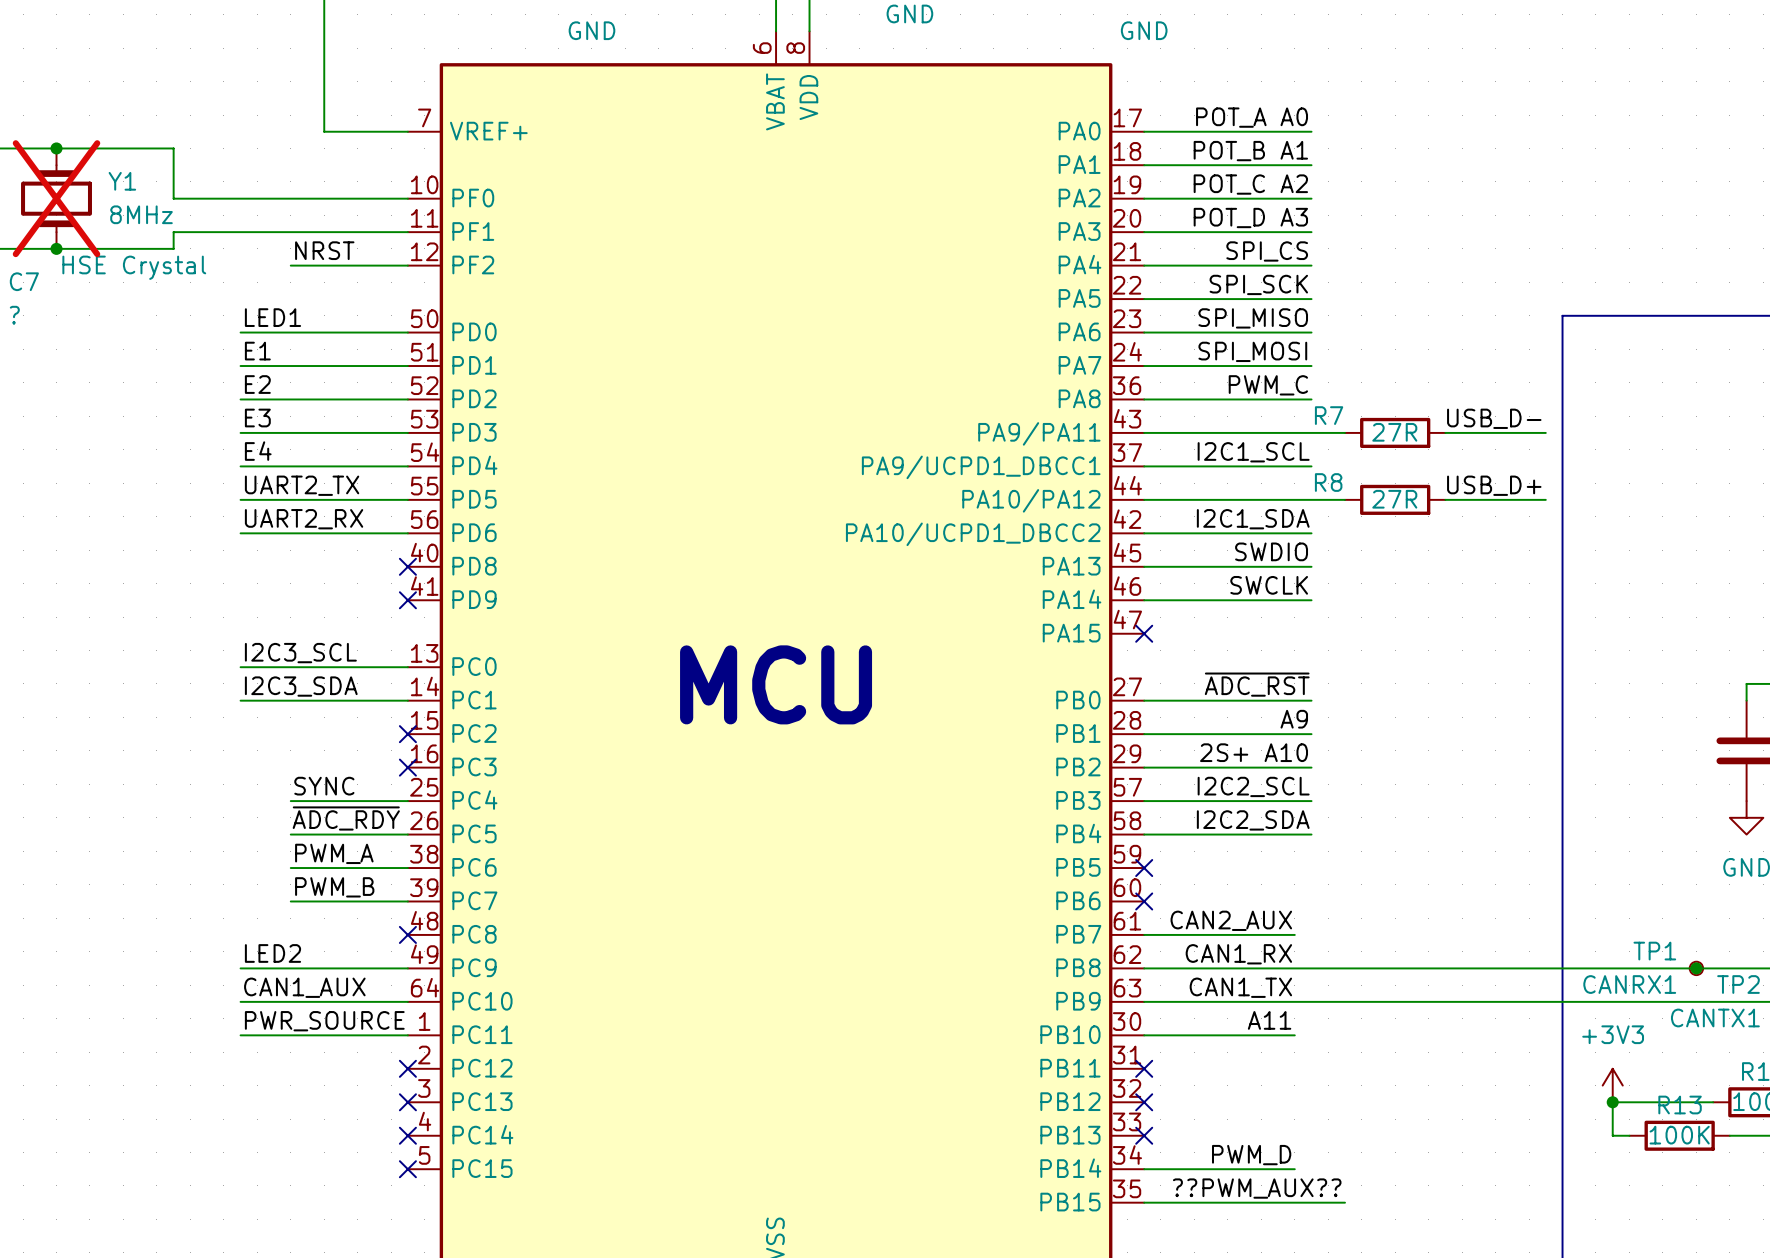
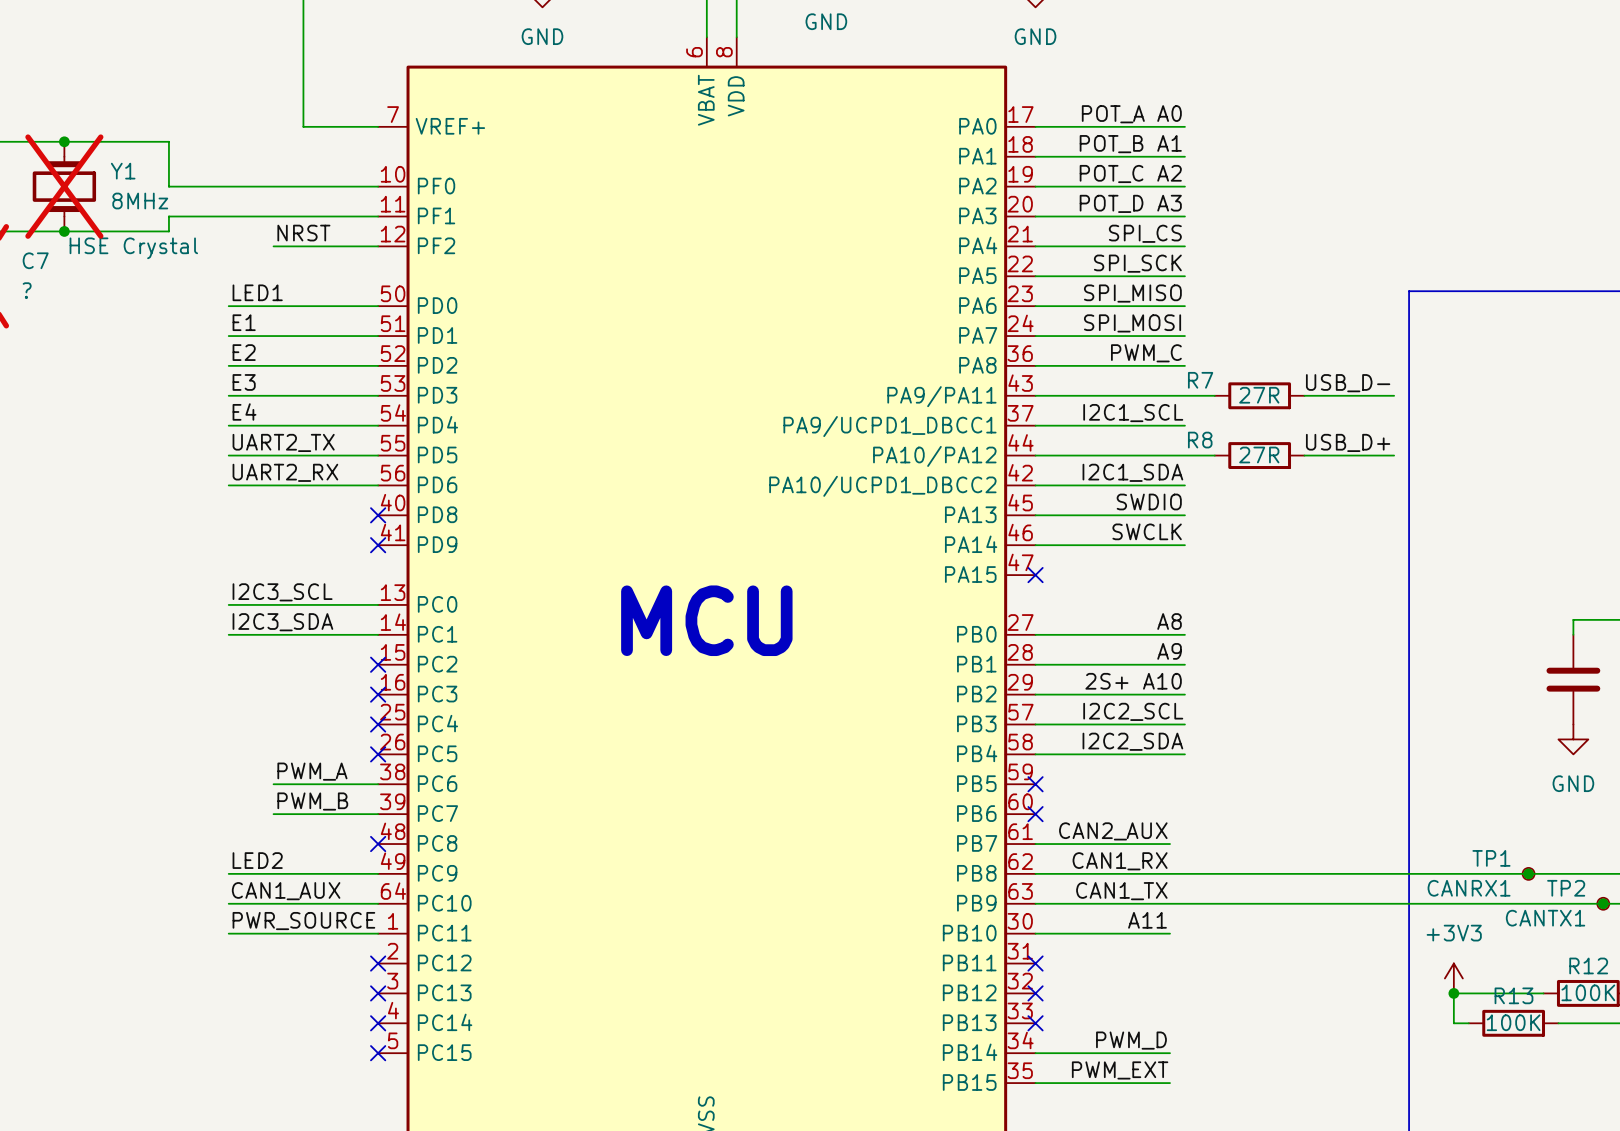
label: ~{ADC_RST} (1257, 684) -> A8 (1169, 621)
label: SYNC (324, 786) -> none
wire: (290, 801) (407, 801) -> none
no-connect mark: none -> (378, 724)
label: ~{ADC_RDY} (346, 818) -> none
wire: (290, 834) (407, 834) -> none
no-connect mark: none -> (378, 754)
label: none -> PWM_EXT (1120, 1070)
label: ??PWM_AUX?? (1257, 1188) -> none
wire: (1294, 1202) (1344, 1202) -> none

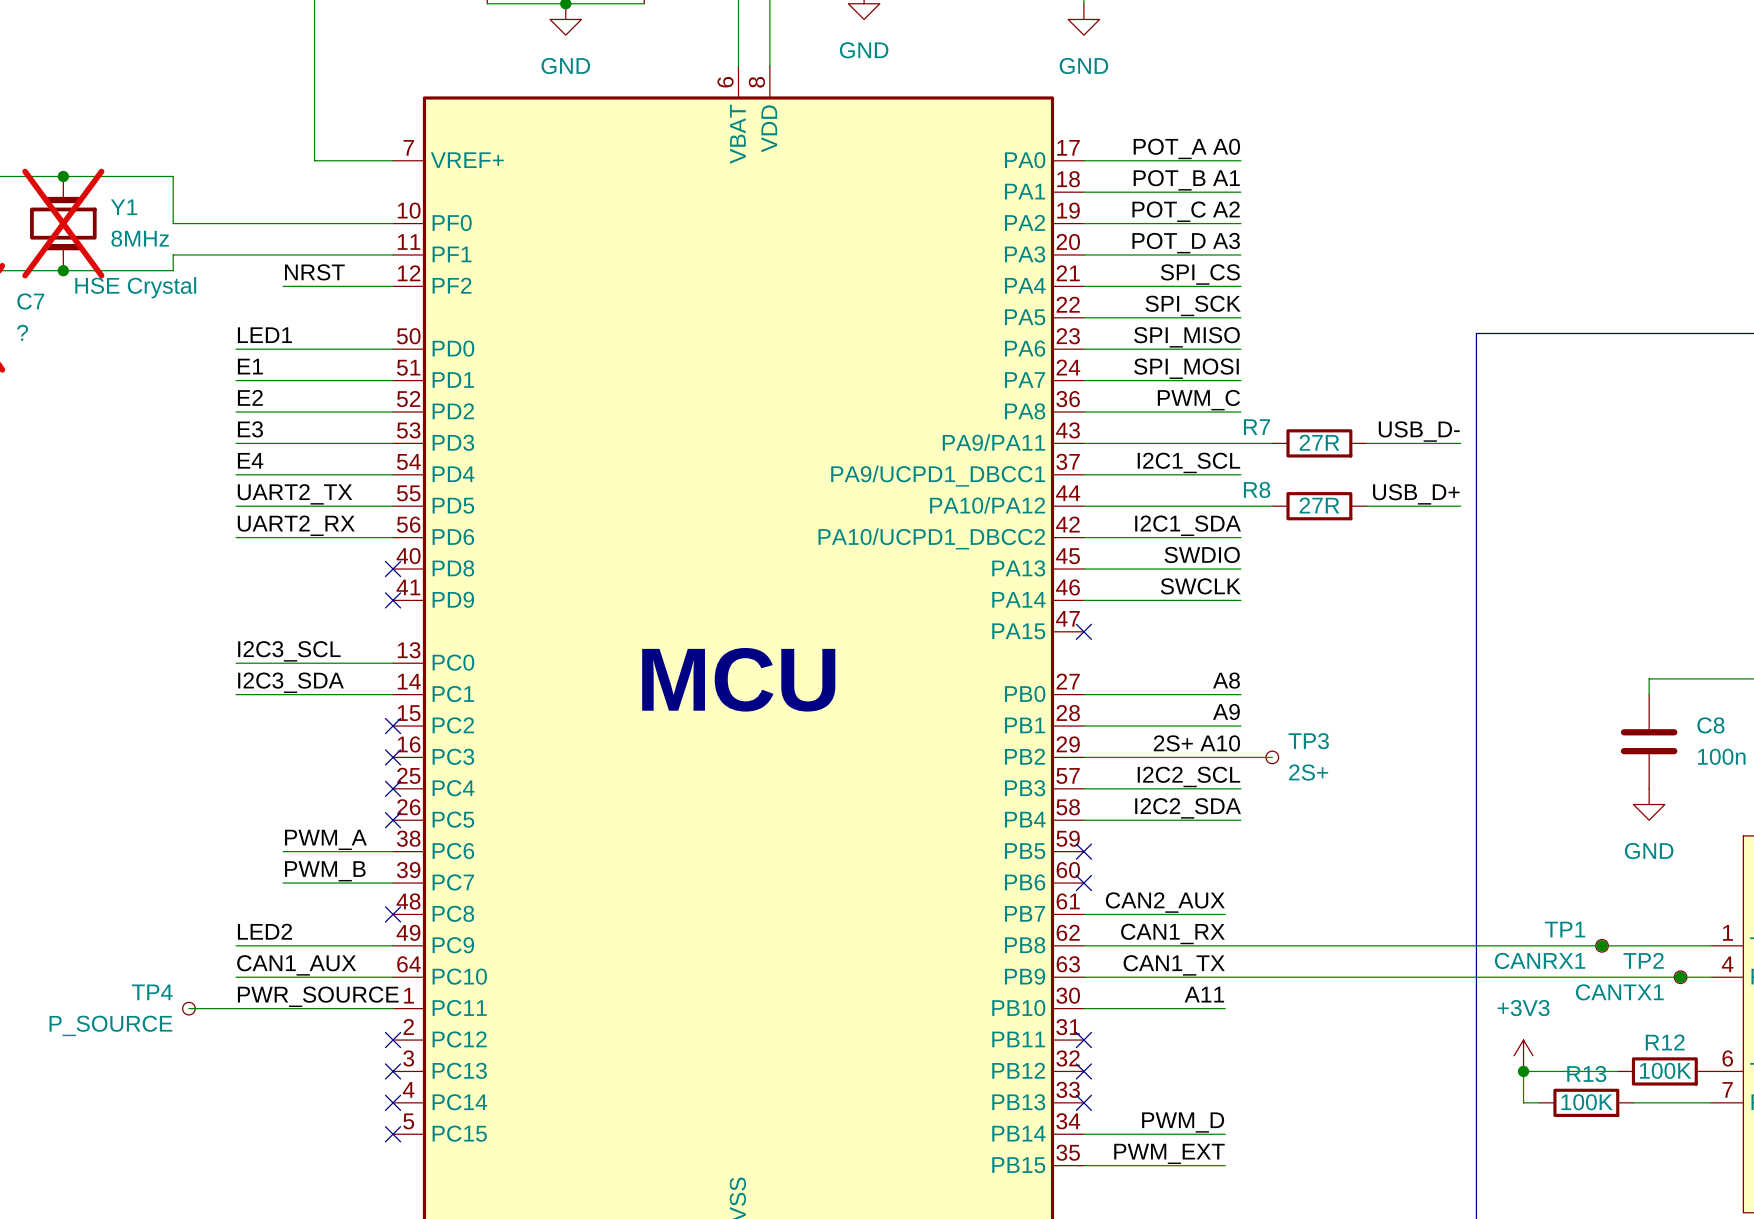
wire: none -> (1240, 757) (1272, 757)
TP3: none -> 2S+ (1272, 757)
wire: none -> (188, 1008) (236, 1008)
TP4: none -> P_SOURCE (188, 1008)

